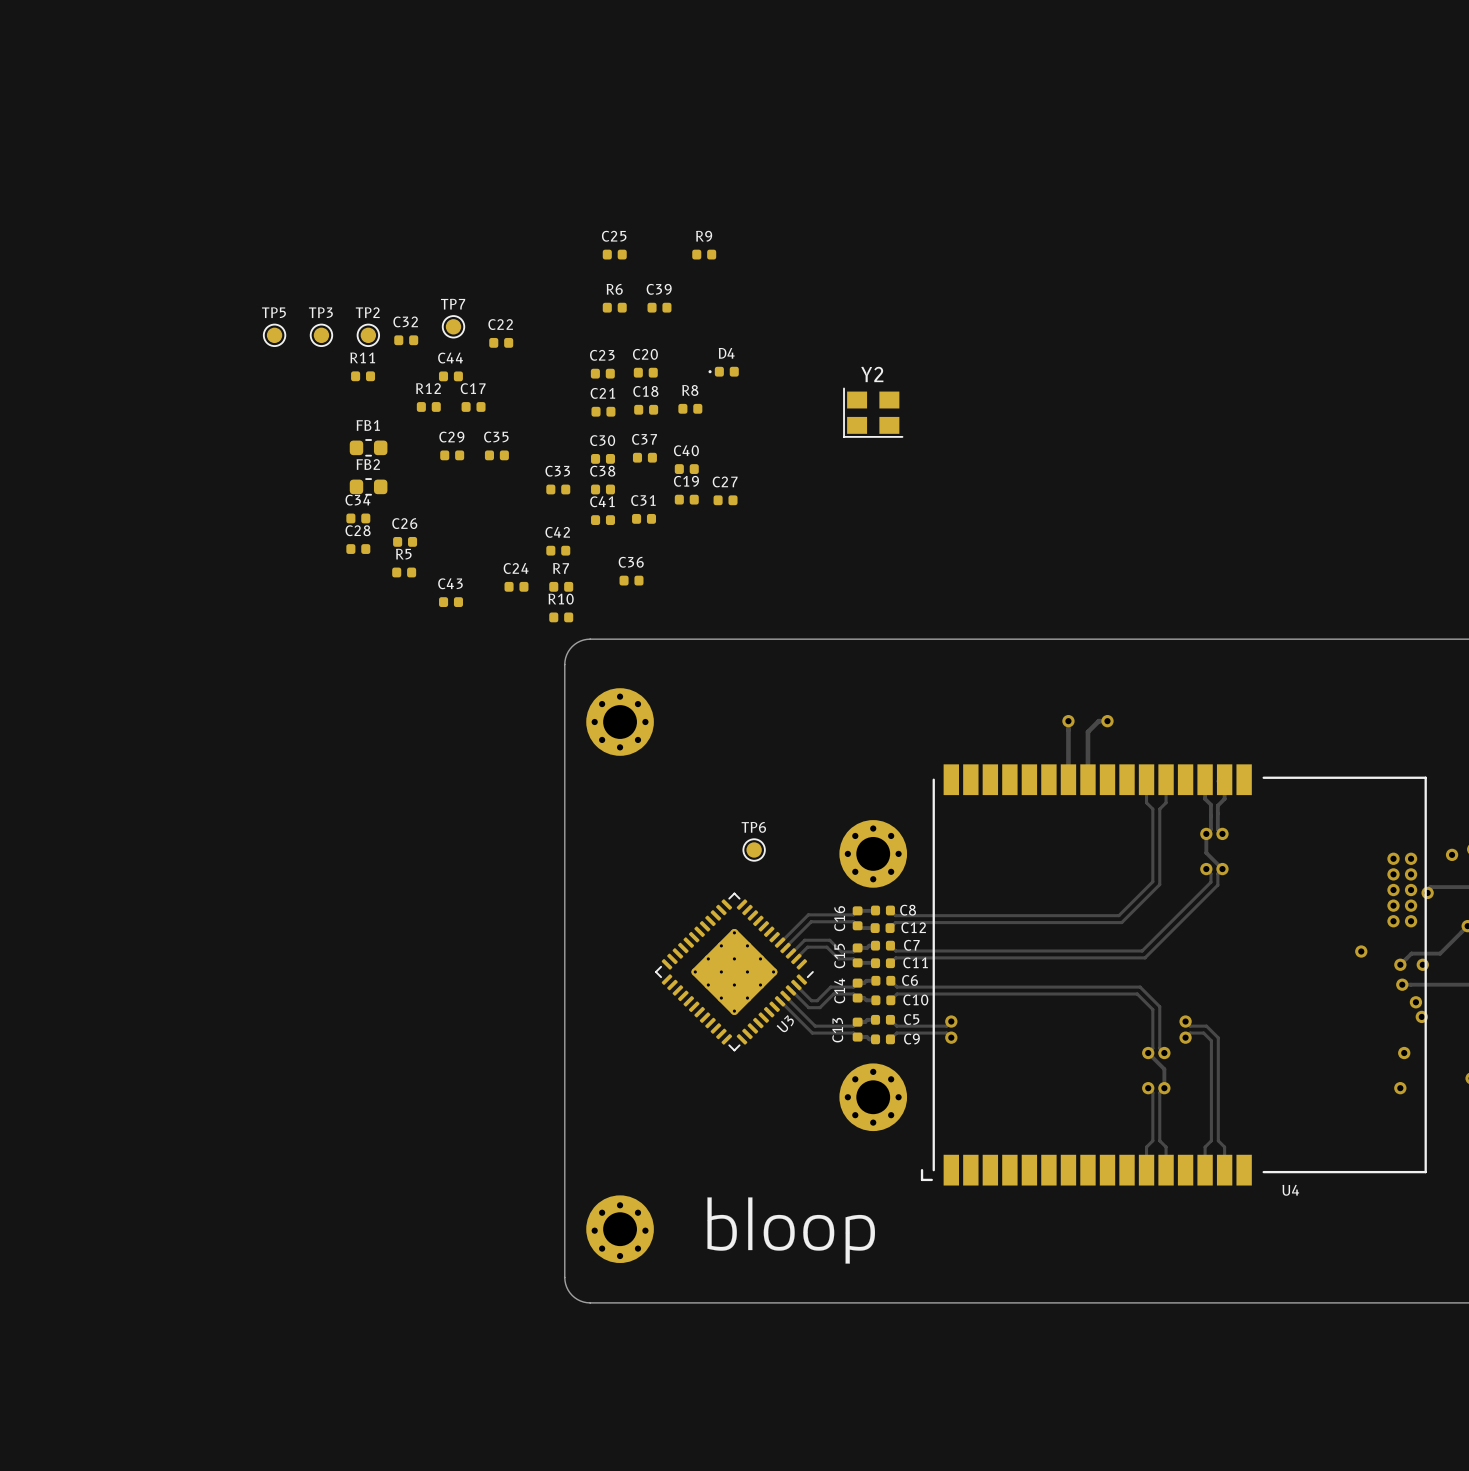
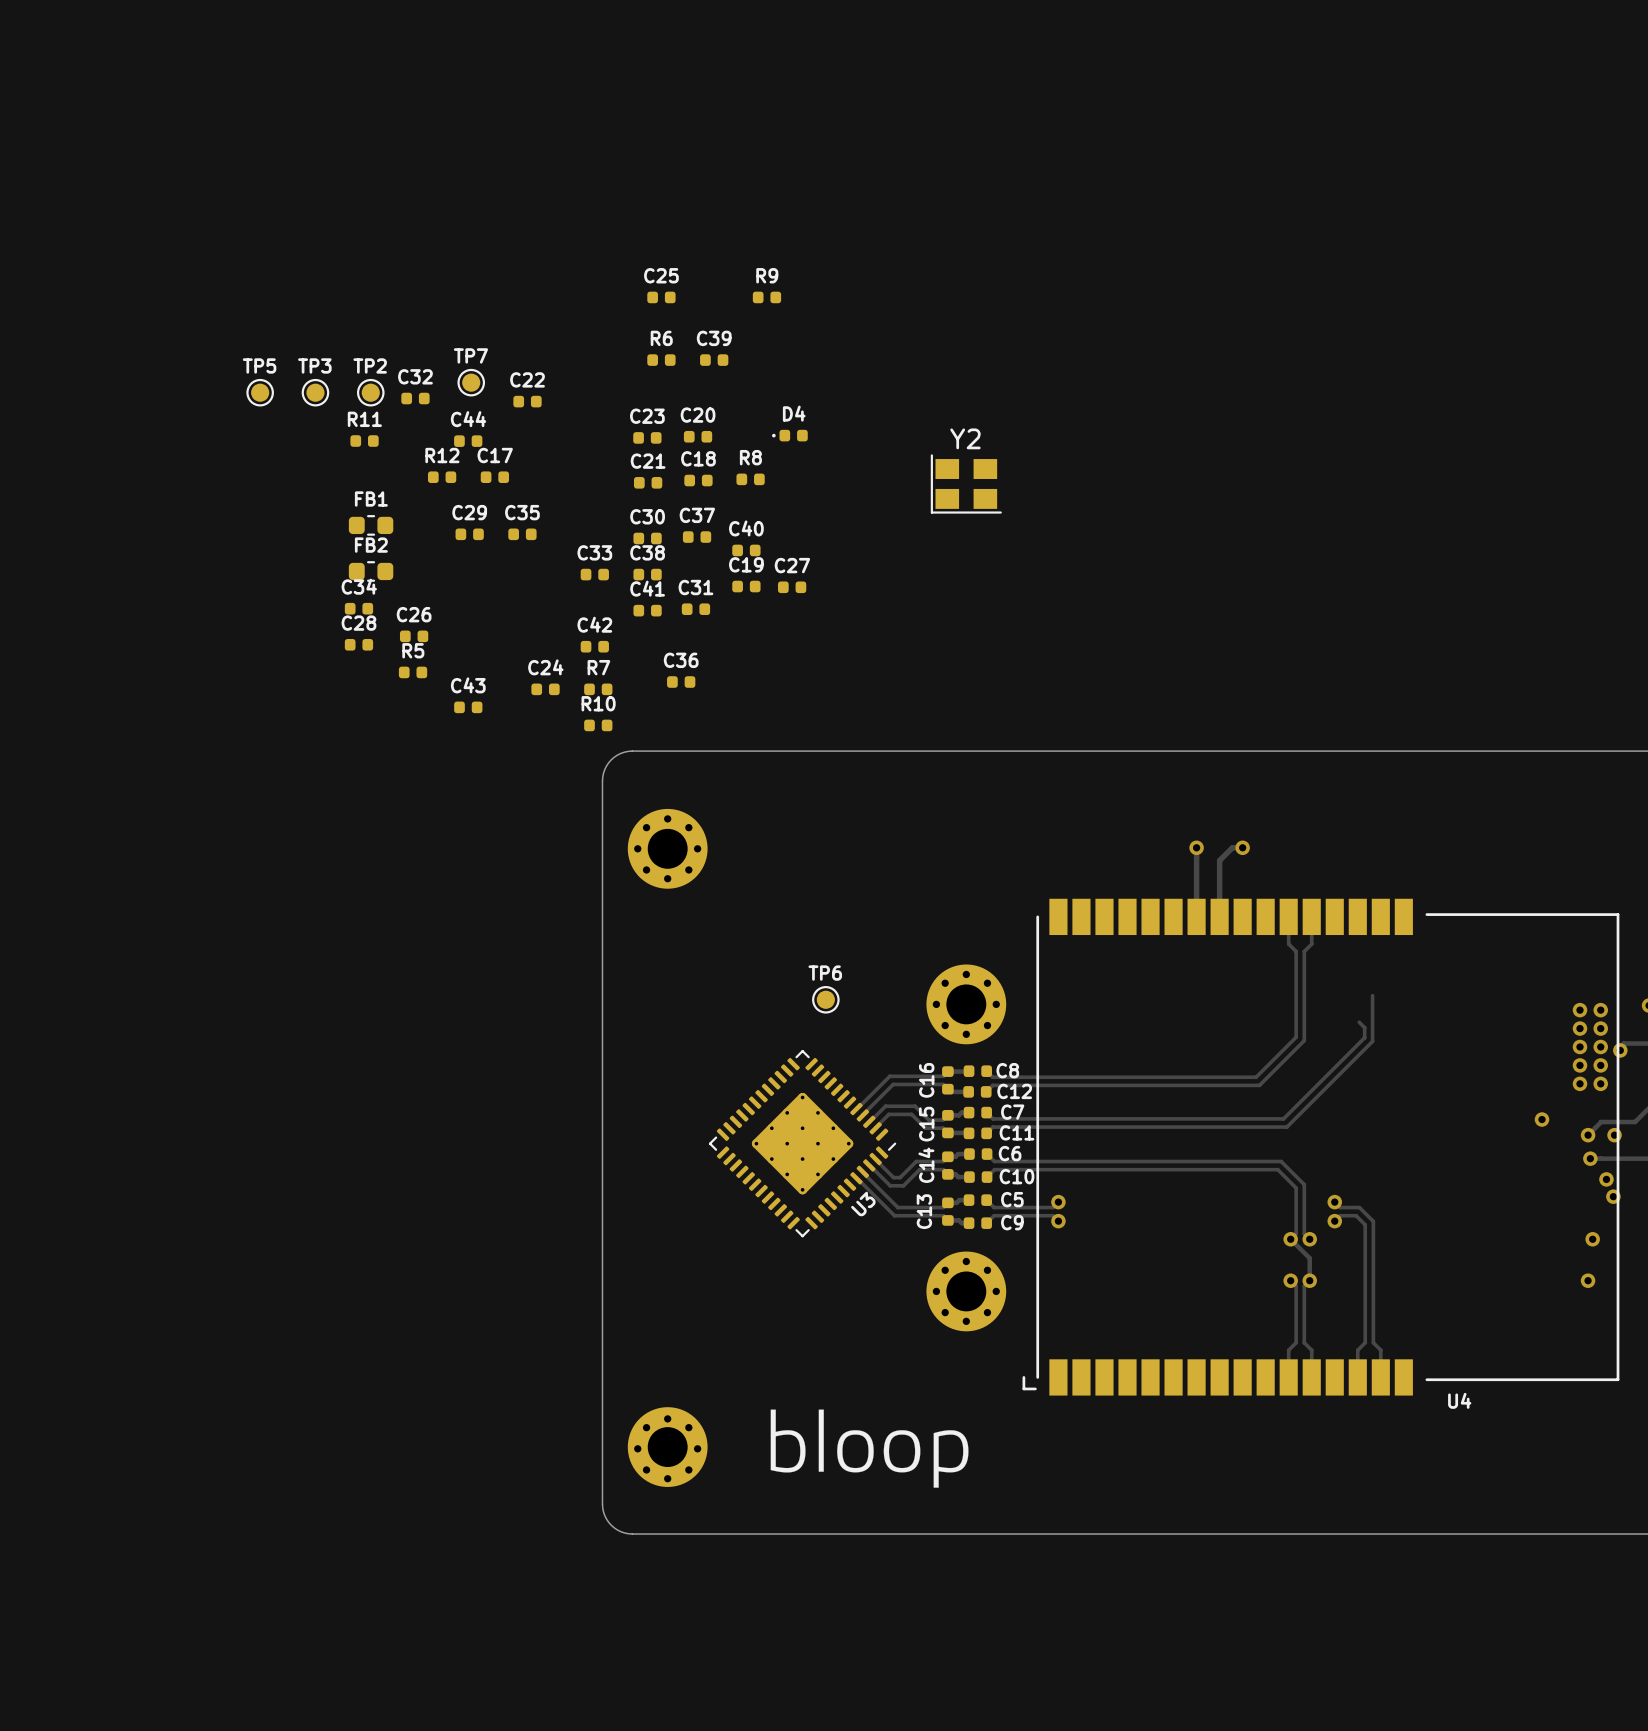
track: (1205, 779) (1205, 798) (1210, 804) (1210, 829) (1206, 833) (1206, 852) (1222, 869) (1217, 873) (1217, 885) -> (1372, 995) (1372, 1041)
track: (1224, 779) (1224, 798) (1217, 805) (1217, 829) (1222, 833) -> none
via: (1206, 833) -> none
via: (1222, 833) -> none
via: (1206, 869) -> none
via: (1222, 869) -> none

